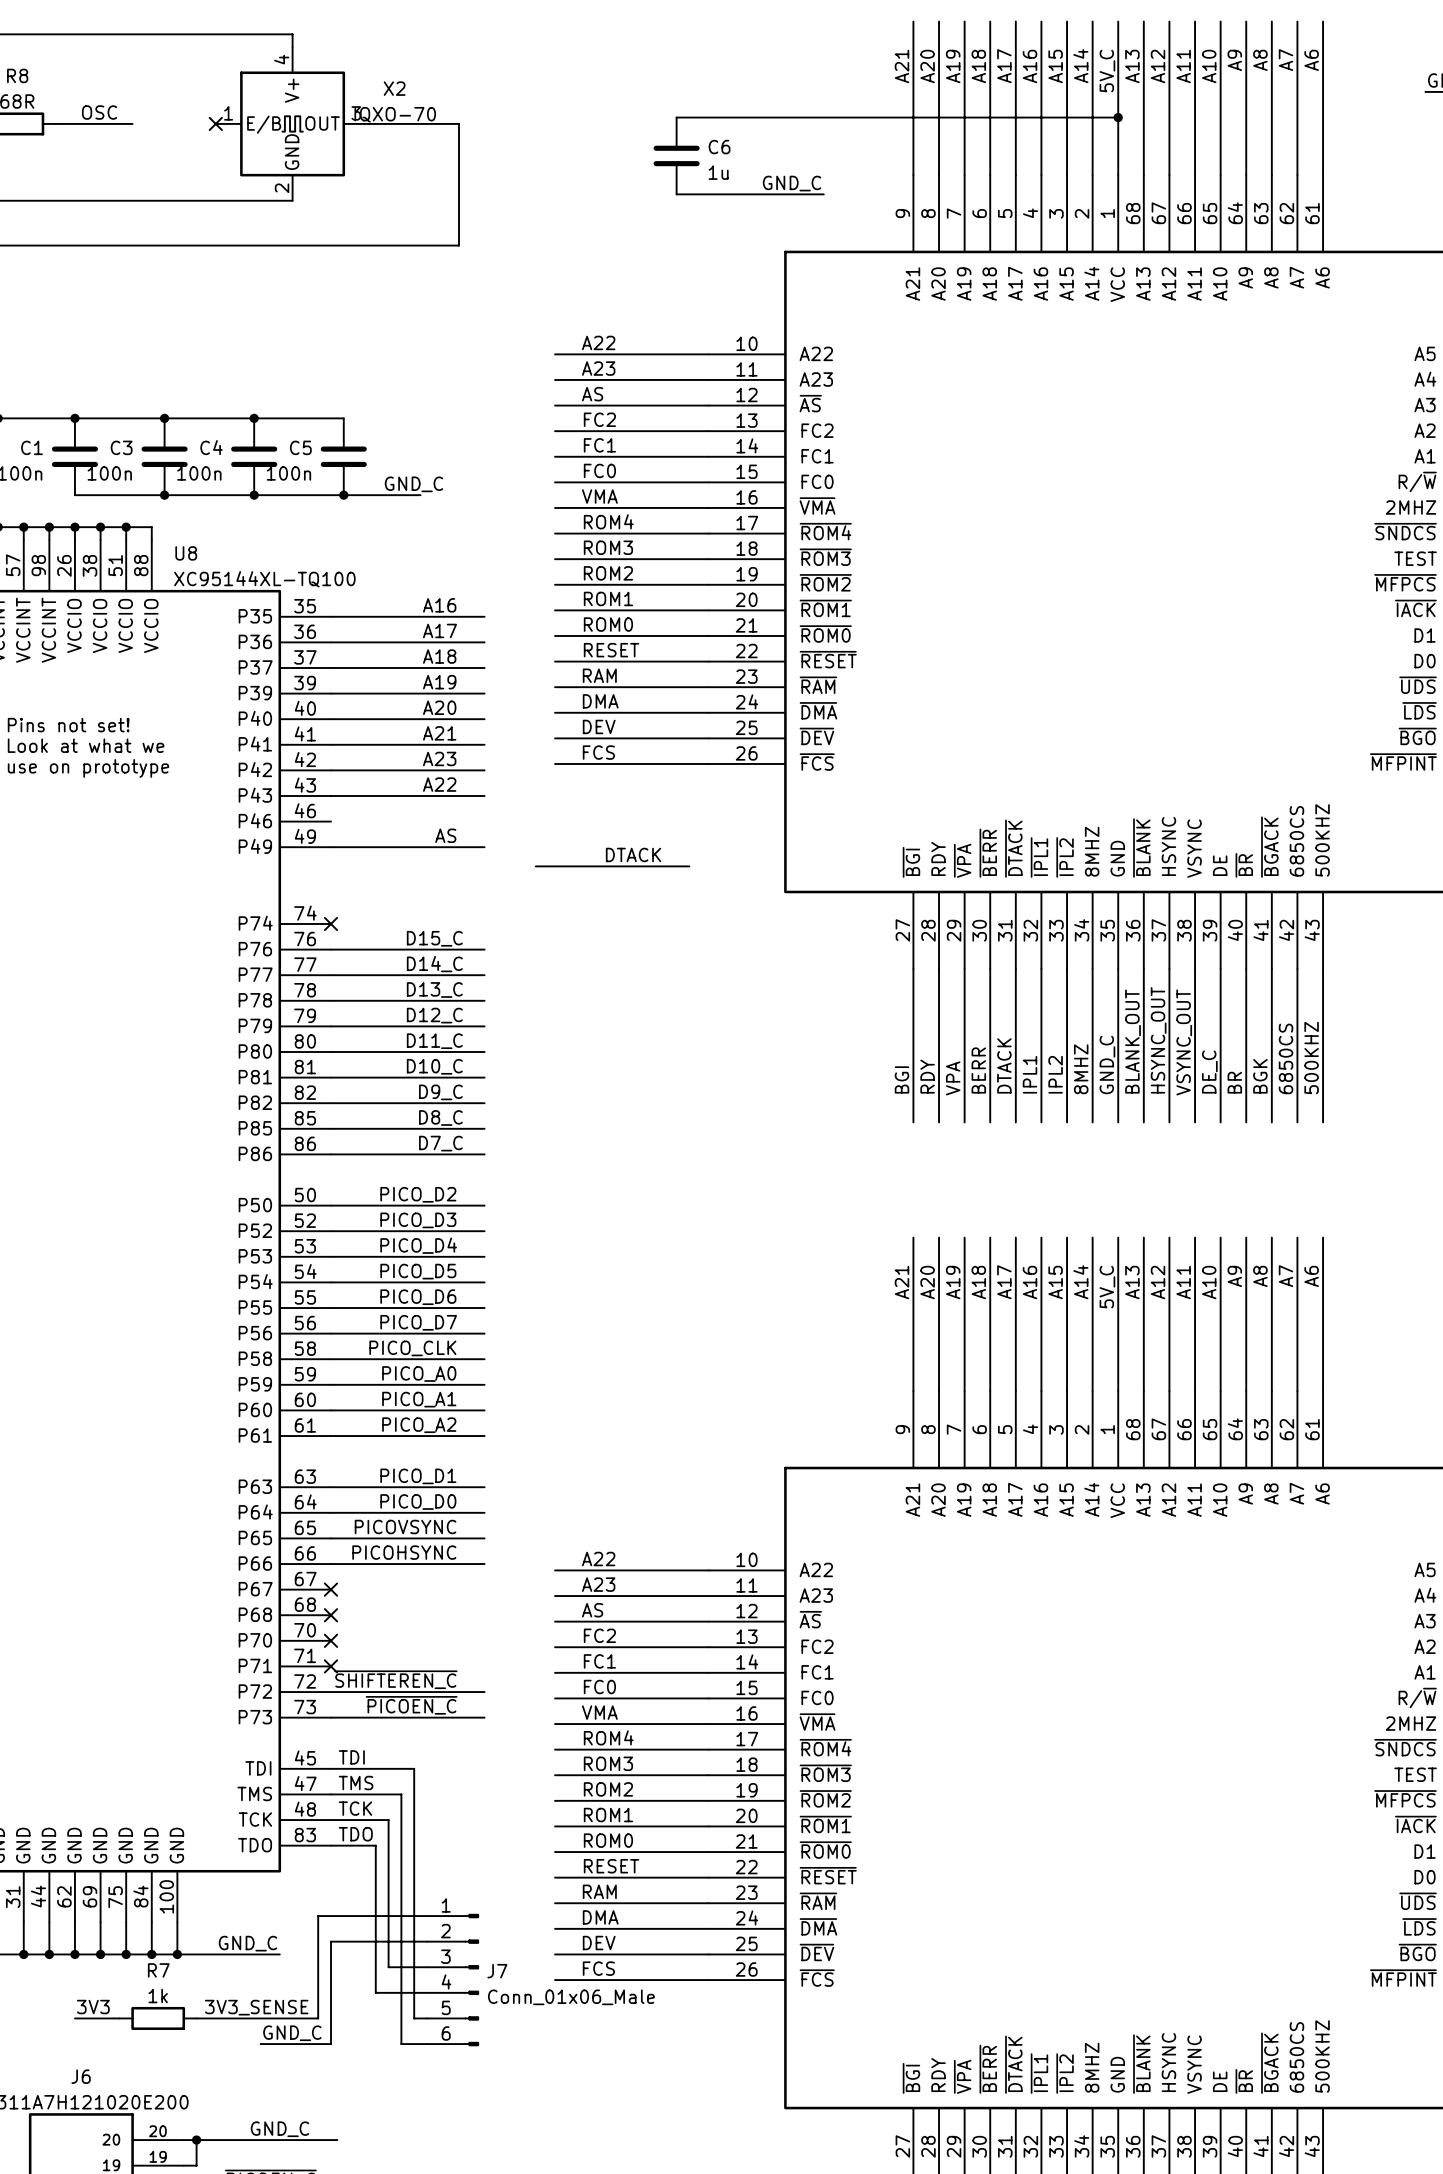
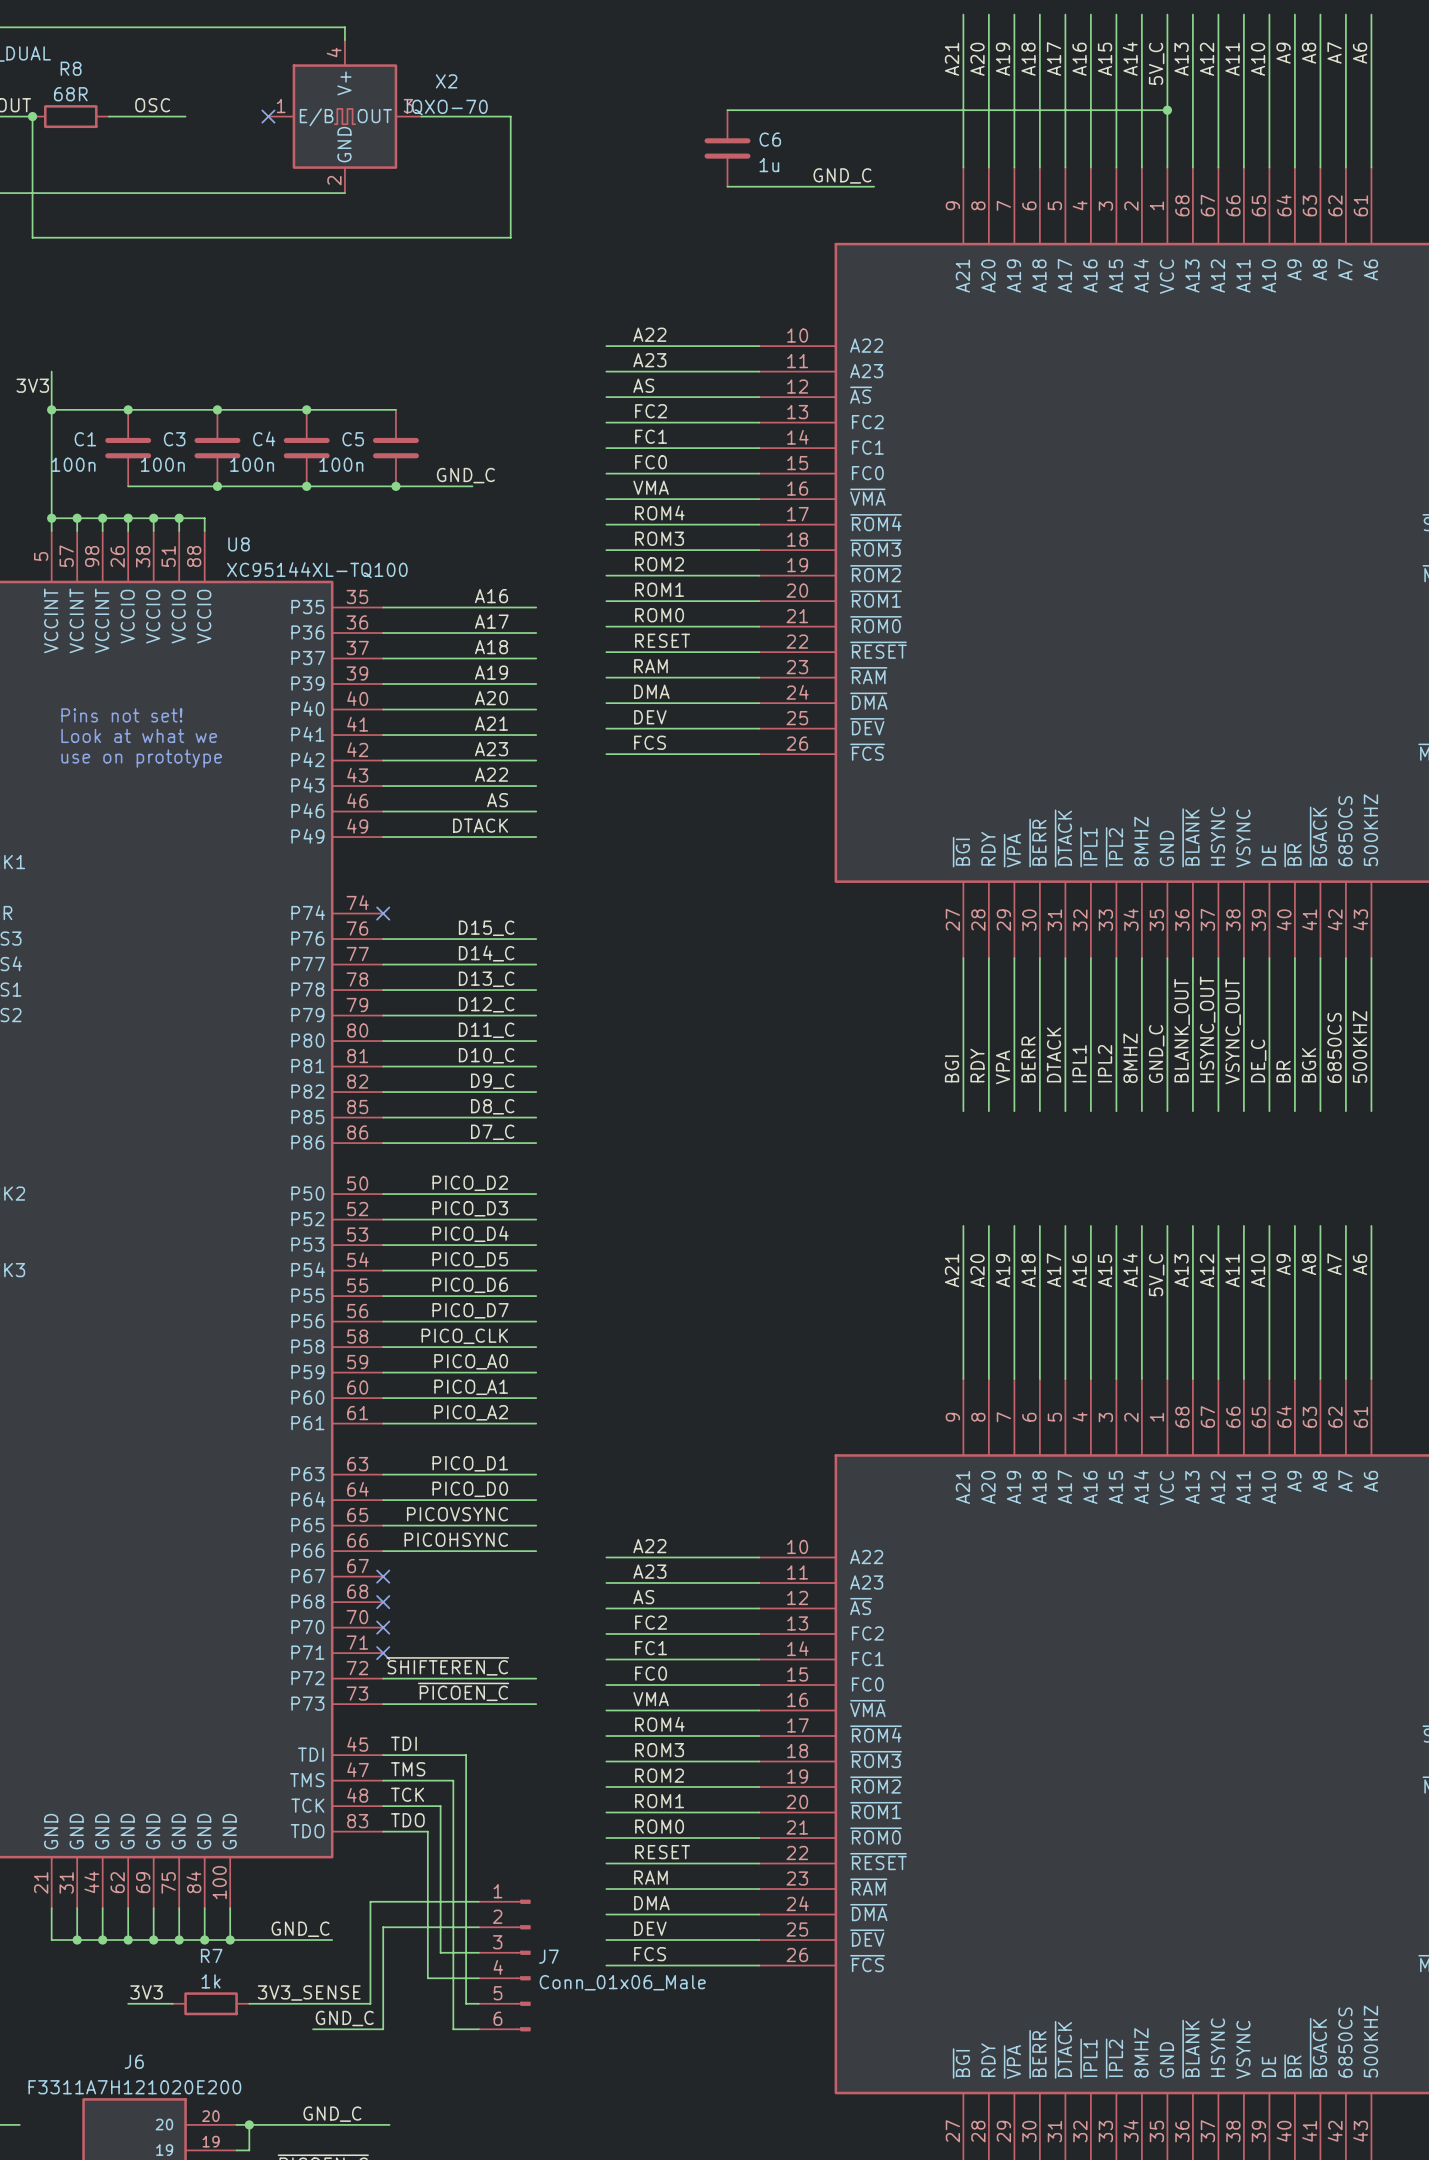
label: none -> AS (497, 800)
label: AS (445, 835) -> DTACK (480, 825)
label: DTACK (633, 854) -> none
wire: (535, 866) (689, 866) -> (383, 811) (536, 811)

